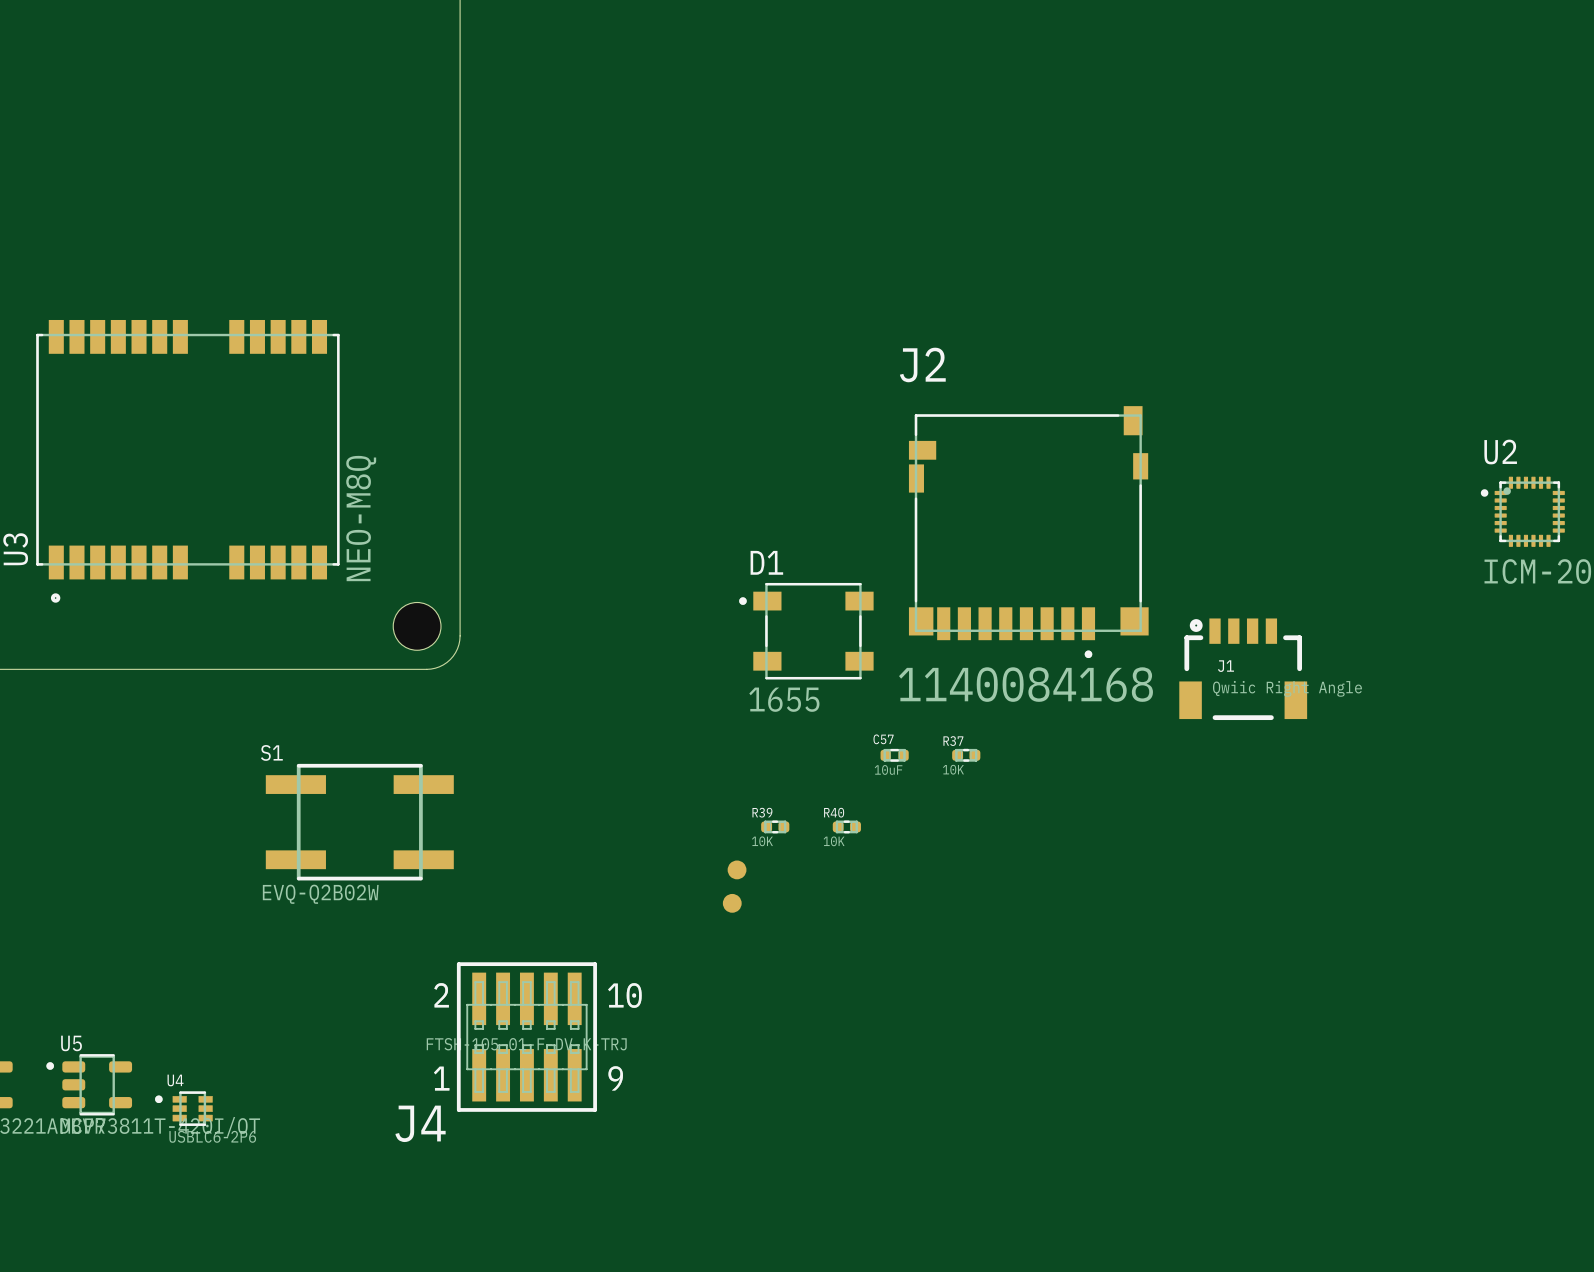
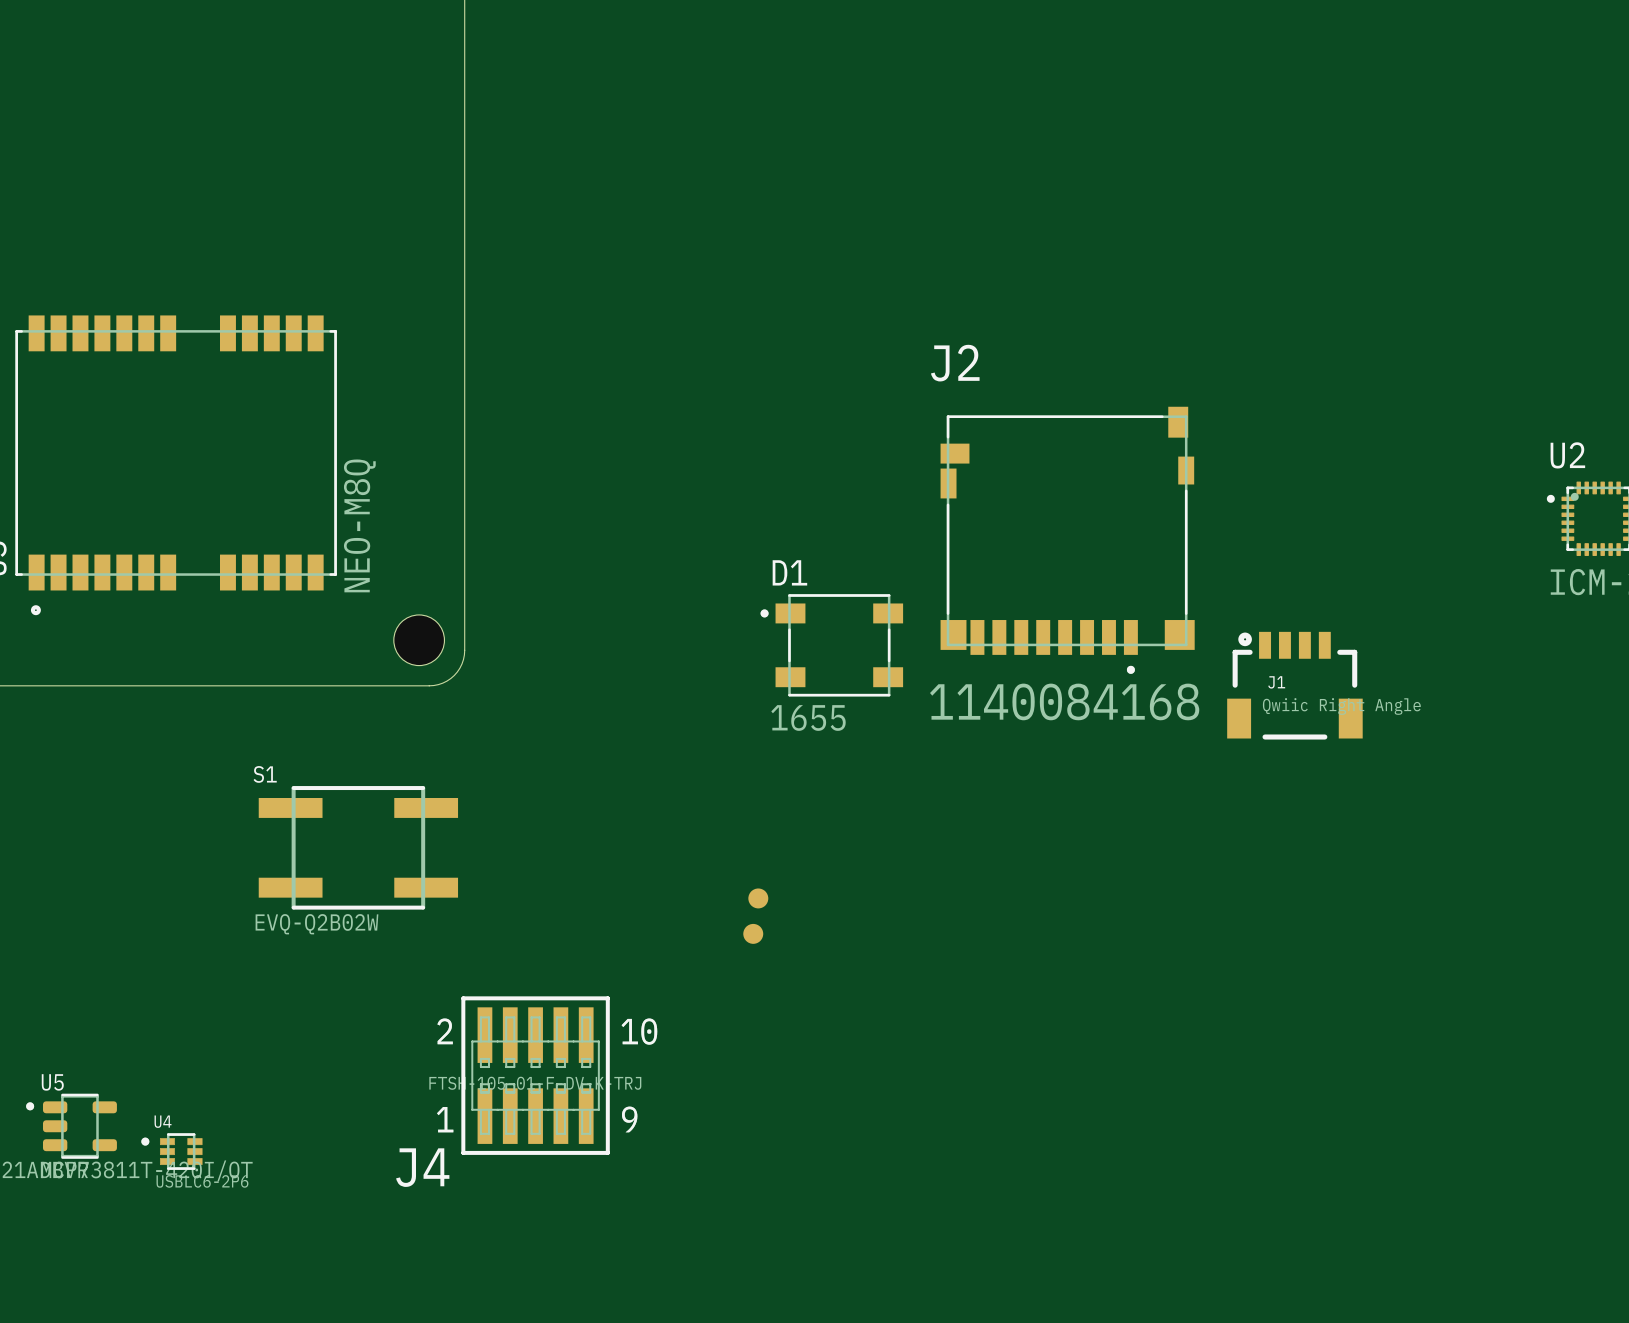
C57: 10uF (894, 755) -> none
R37: 10K (966, 755) -> none
R39: 10K (775, 826) -> none
R40: 10K (846, 826) -> none

